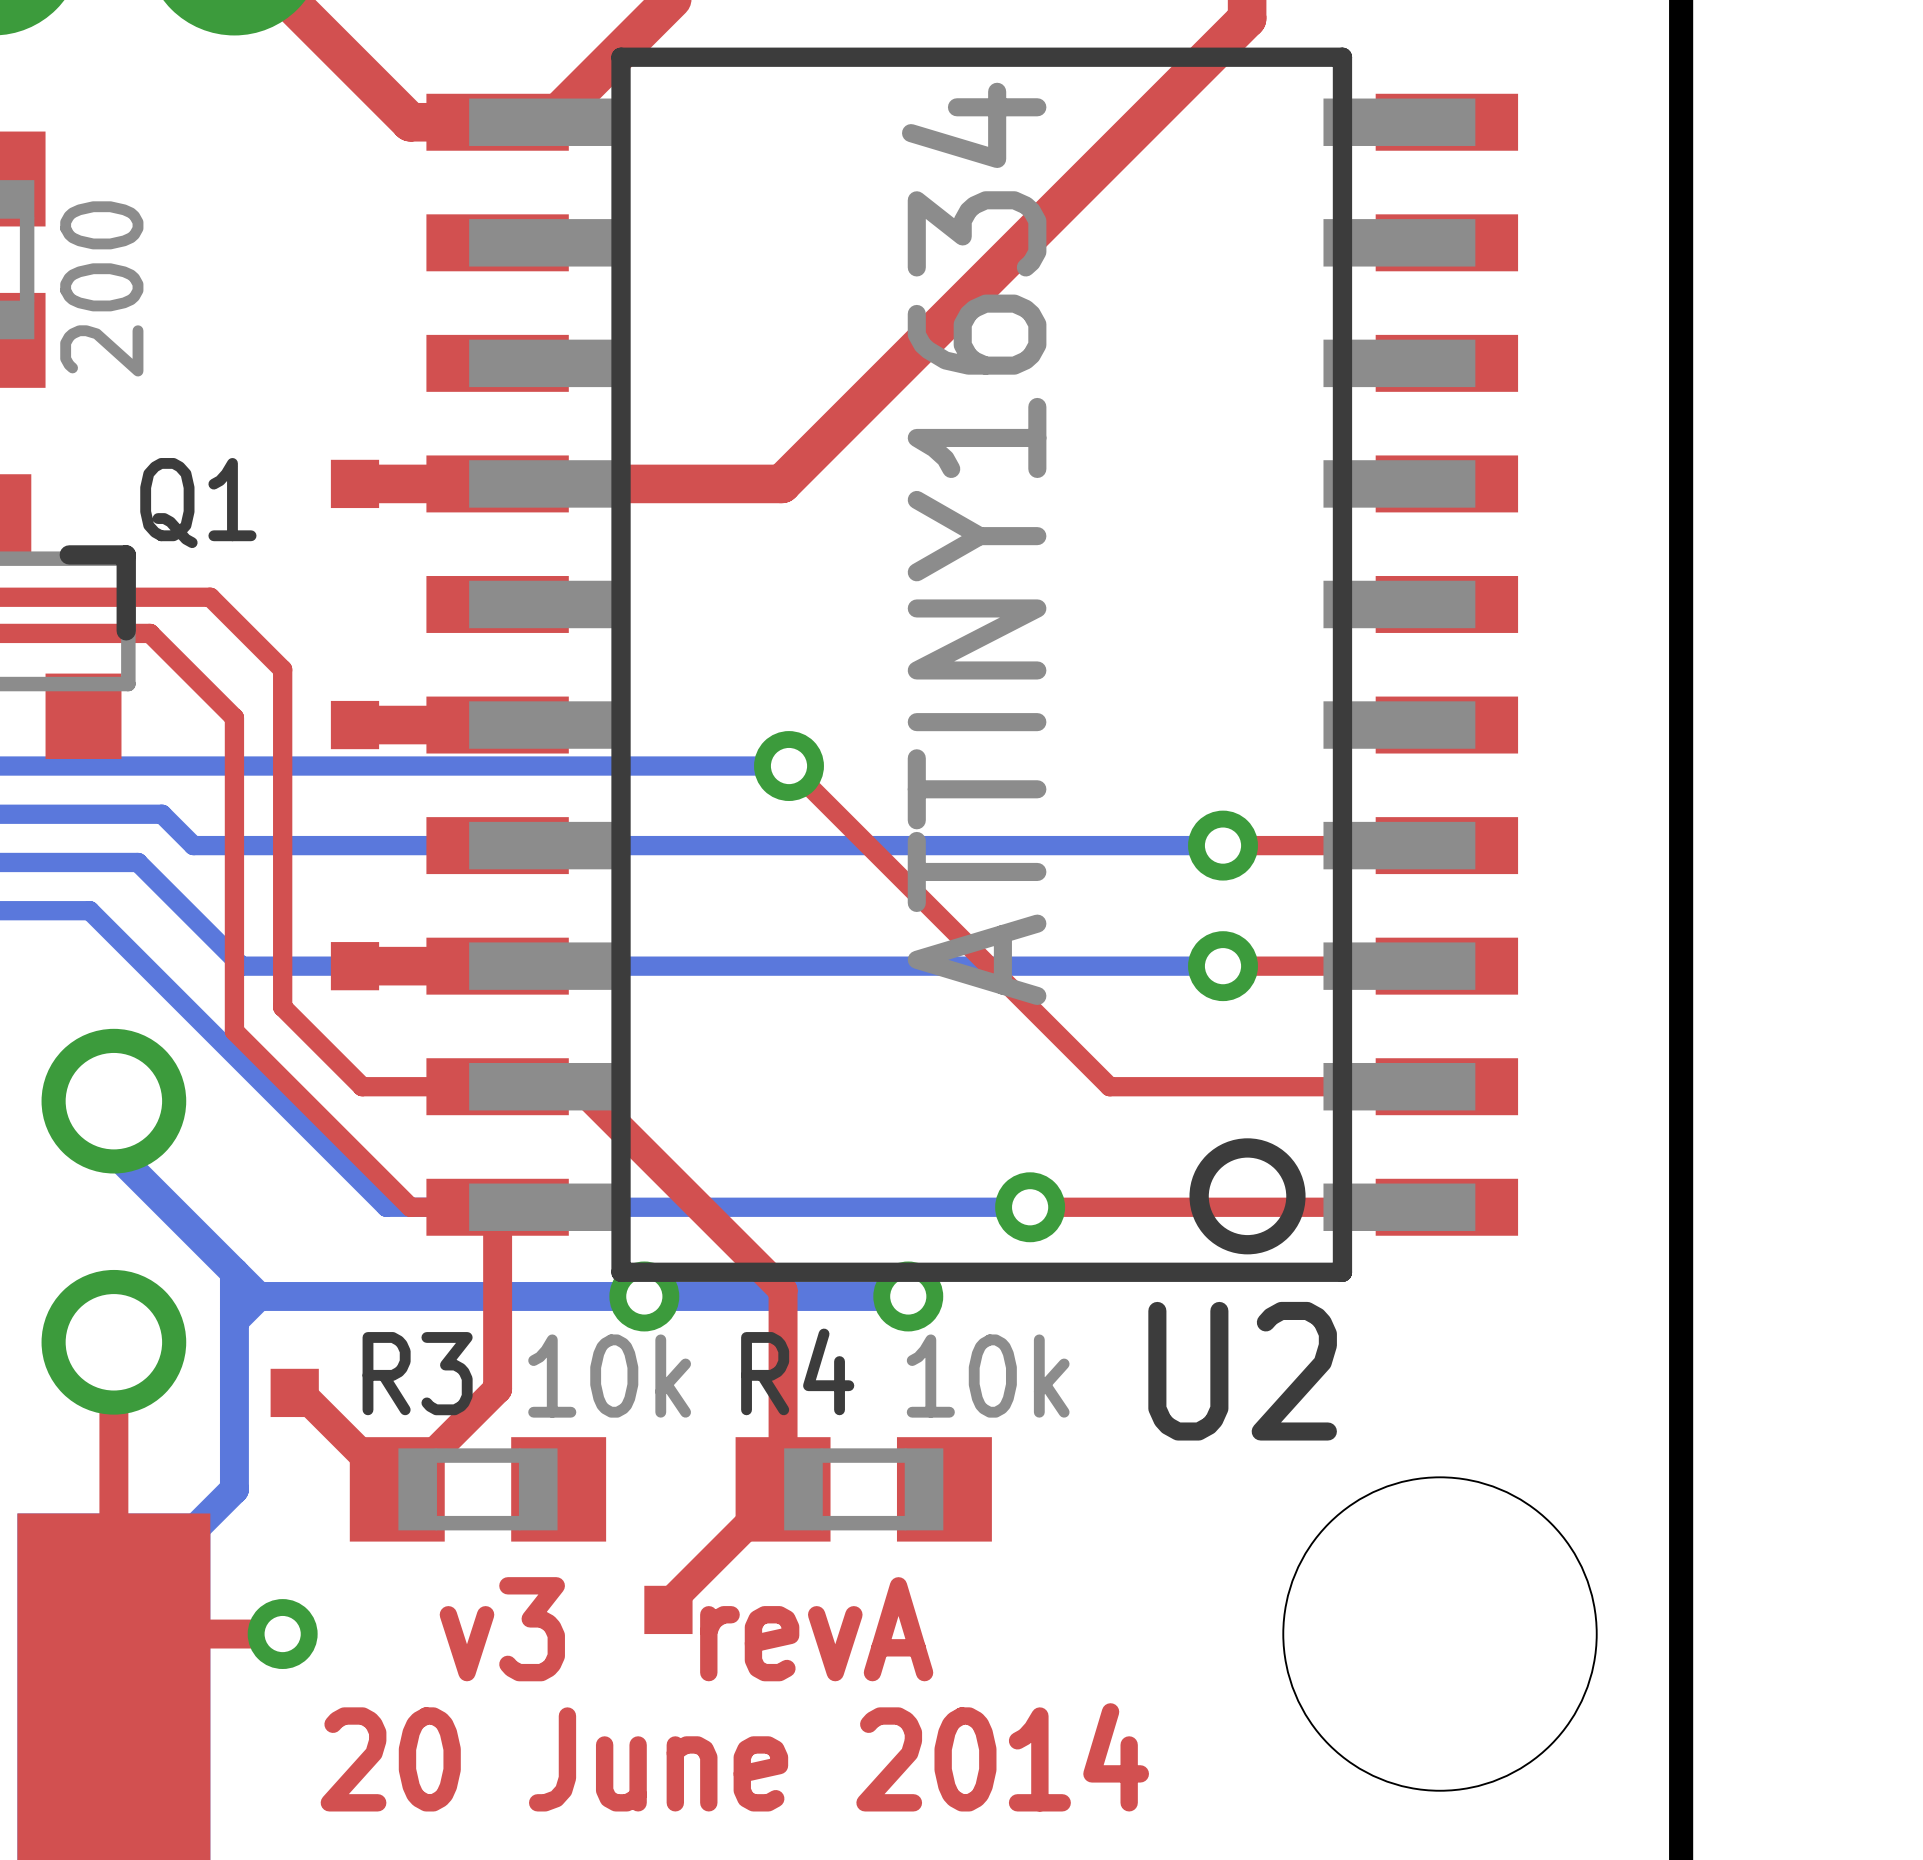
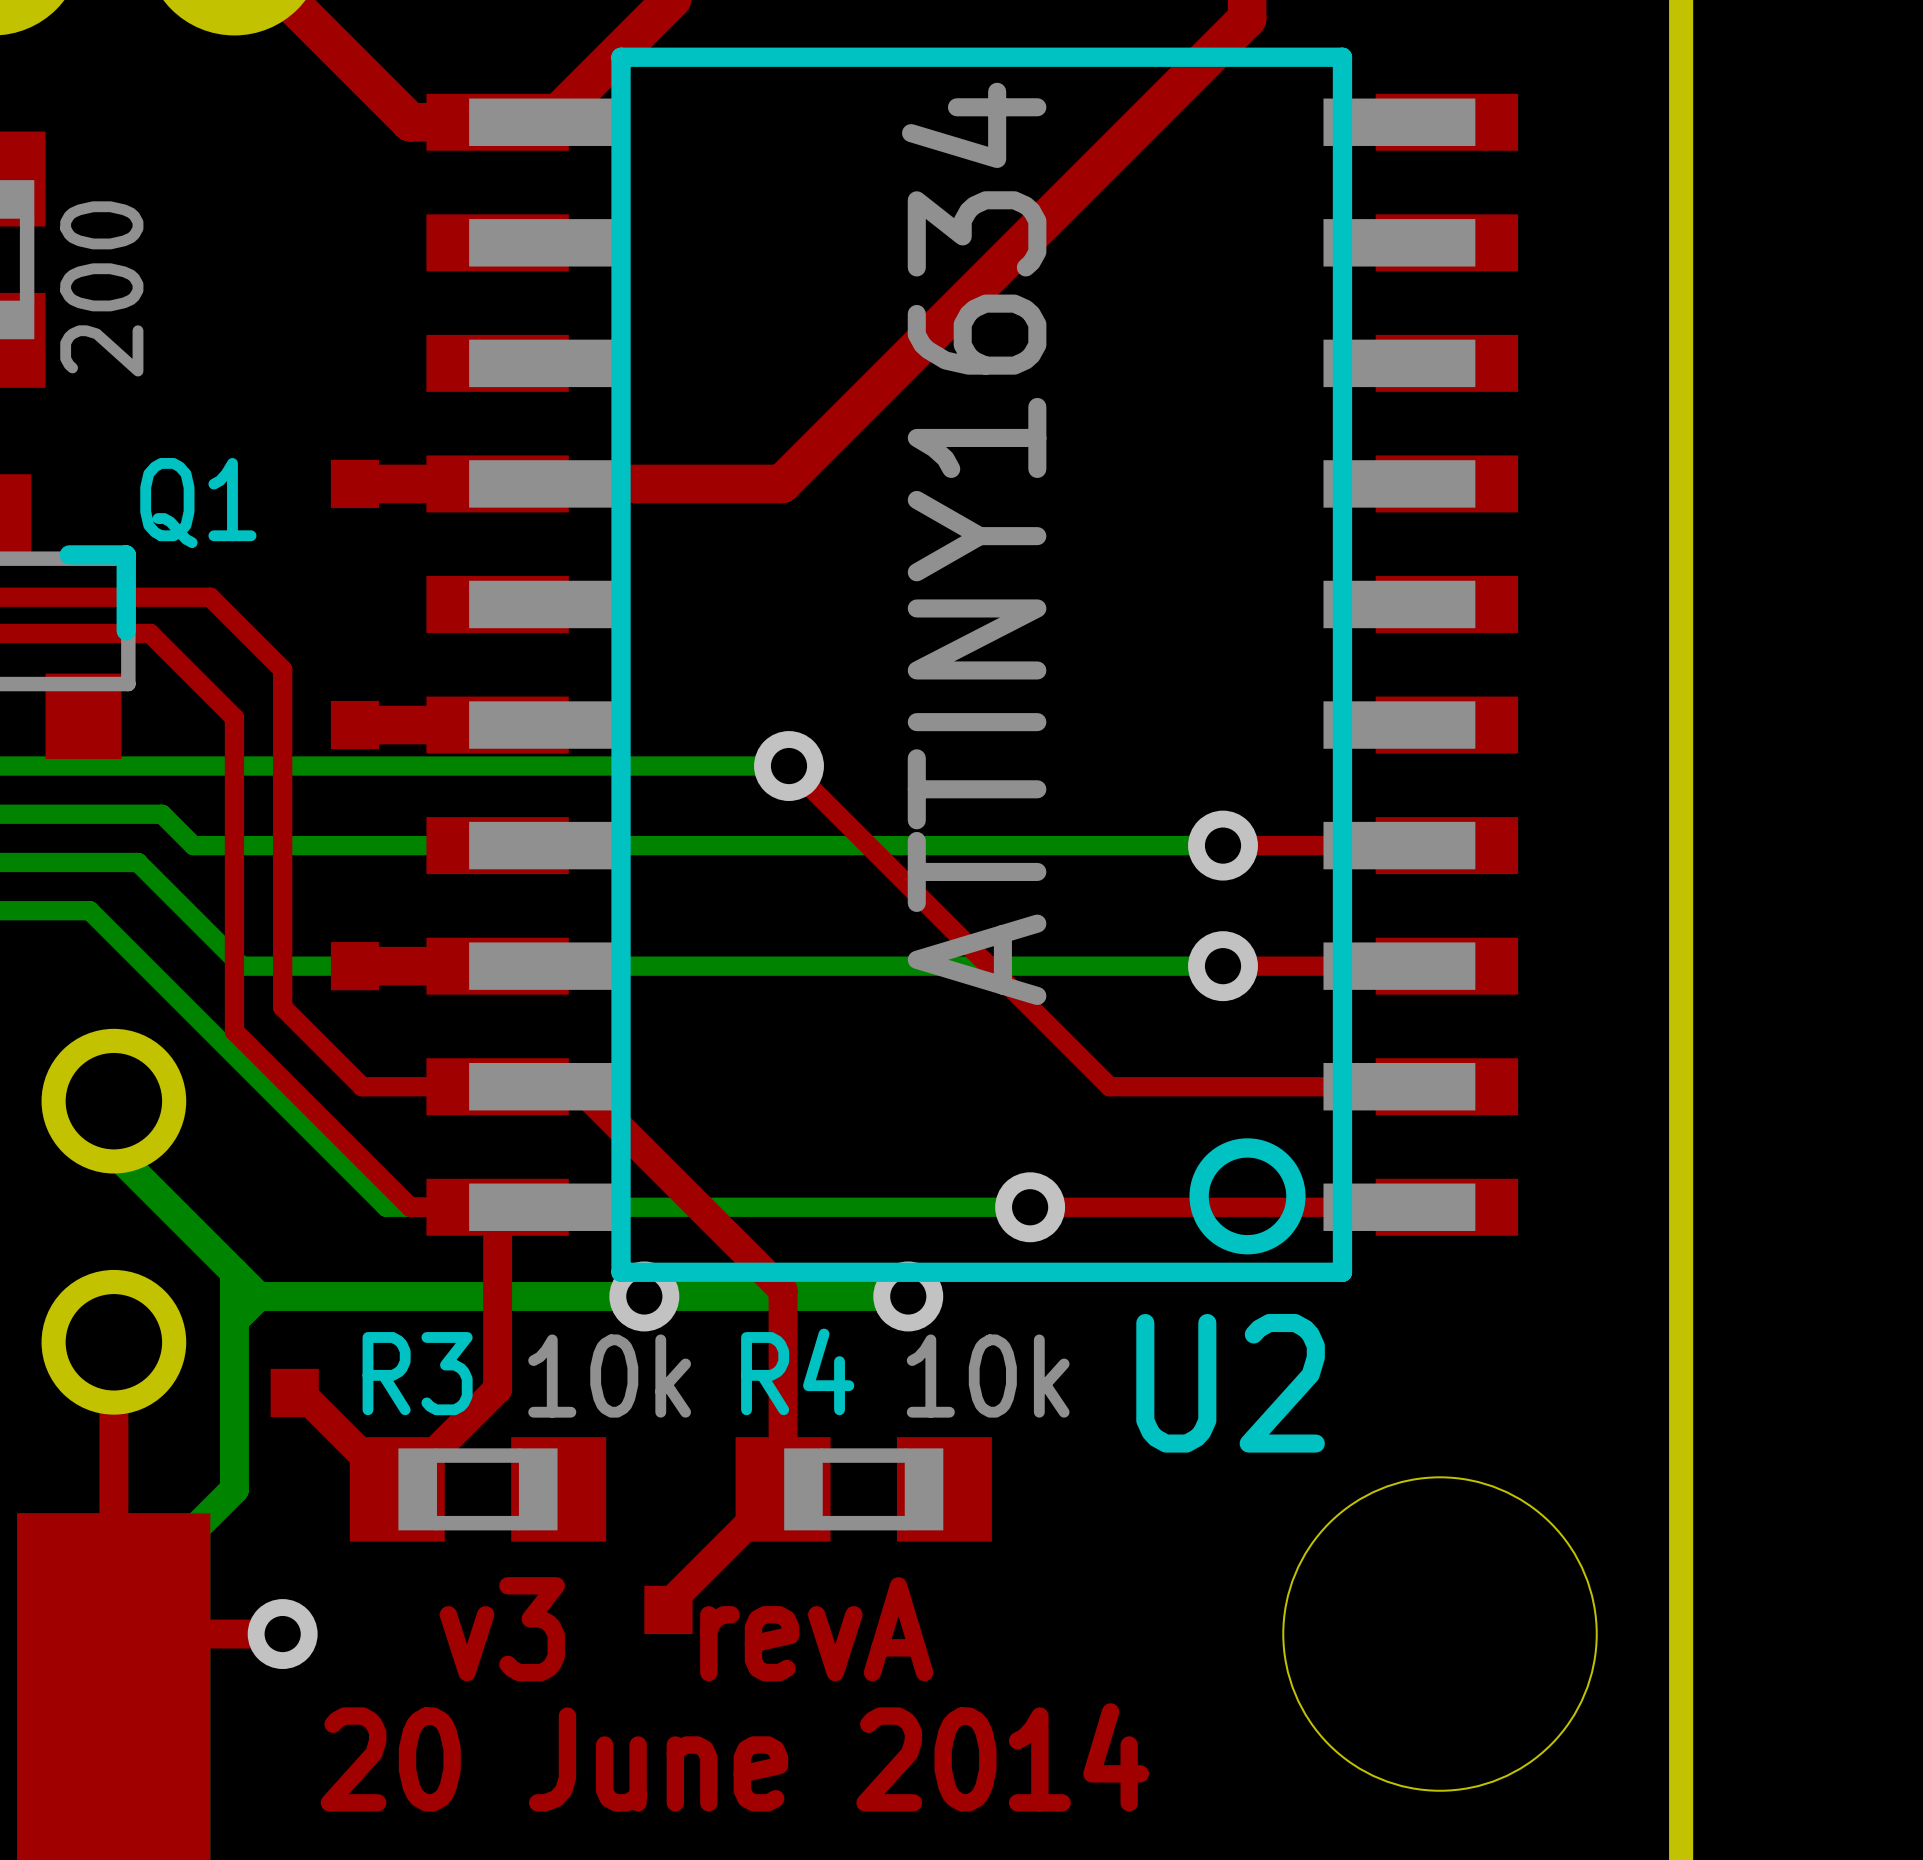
U2 name position: U2 (1242, 1371) -> U2 (1230, 1383)

